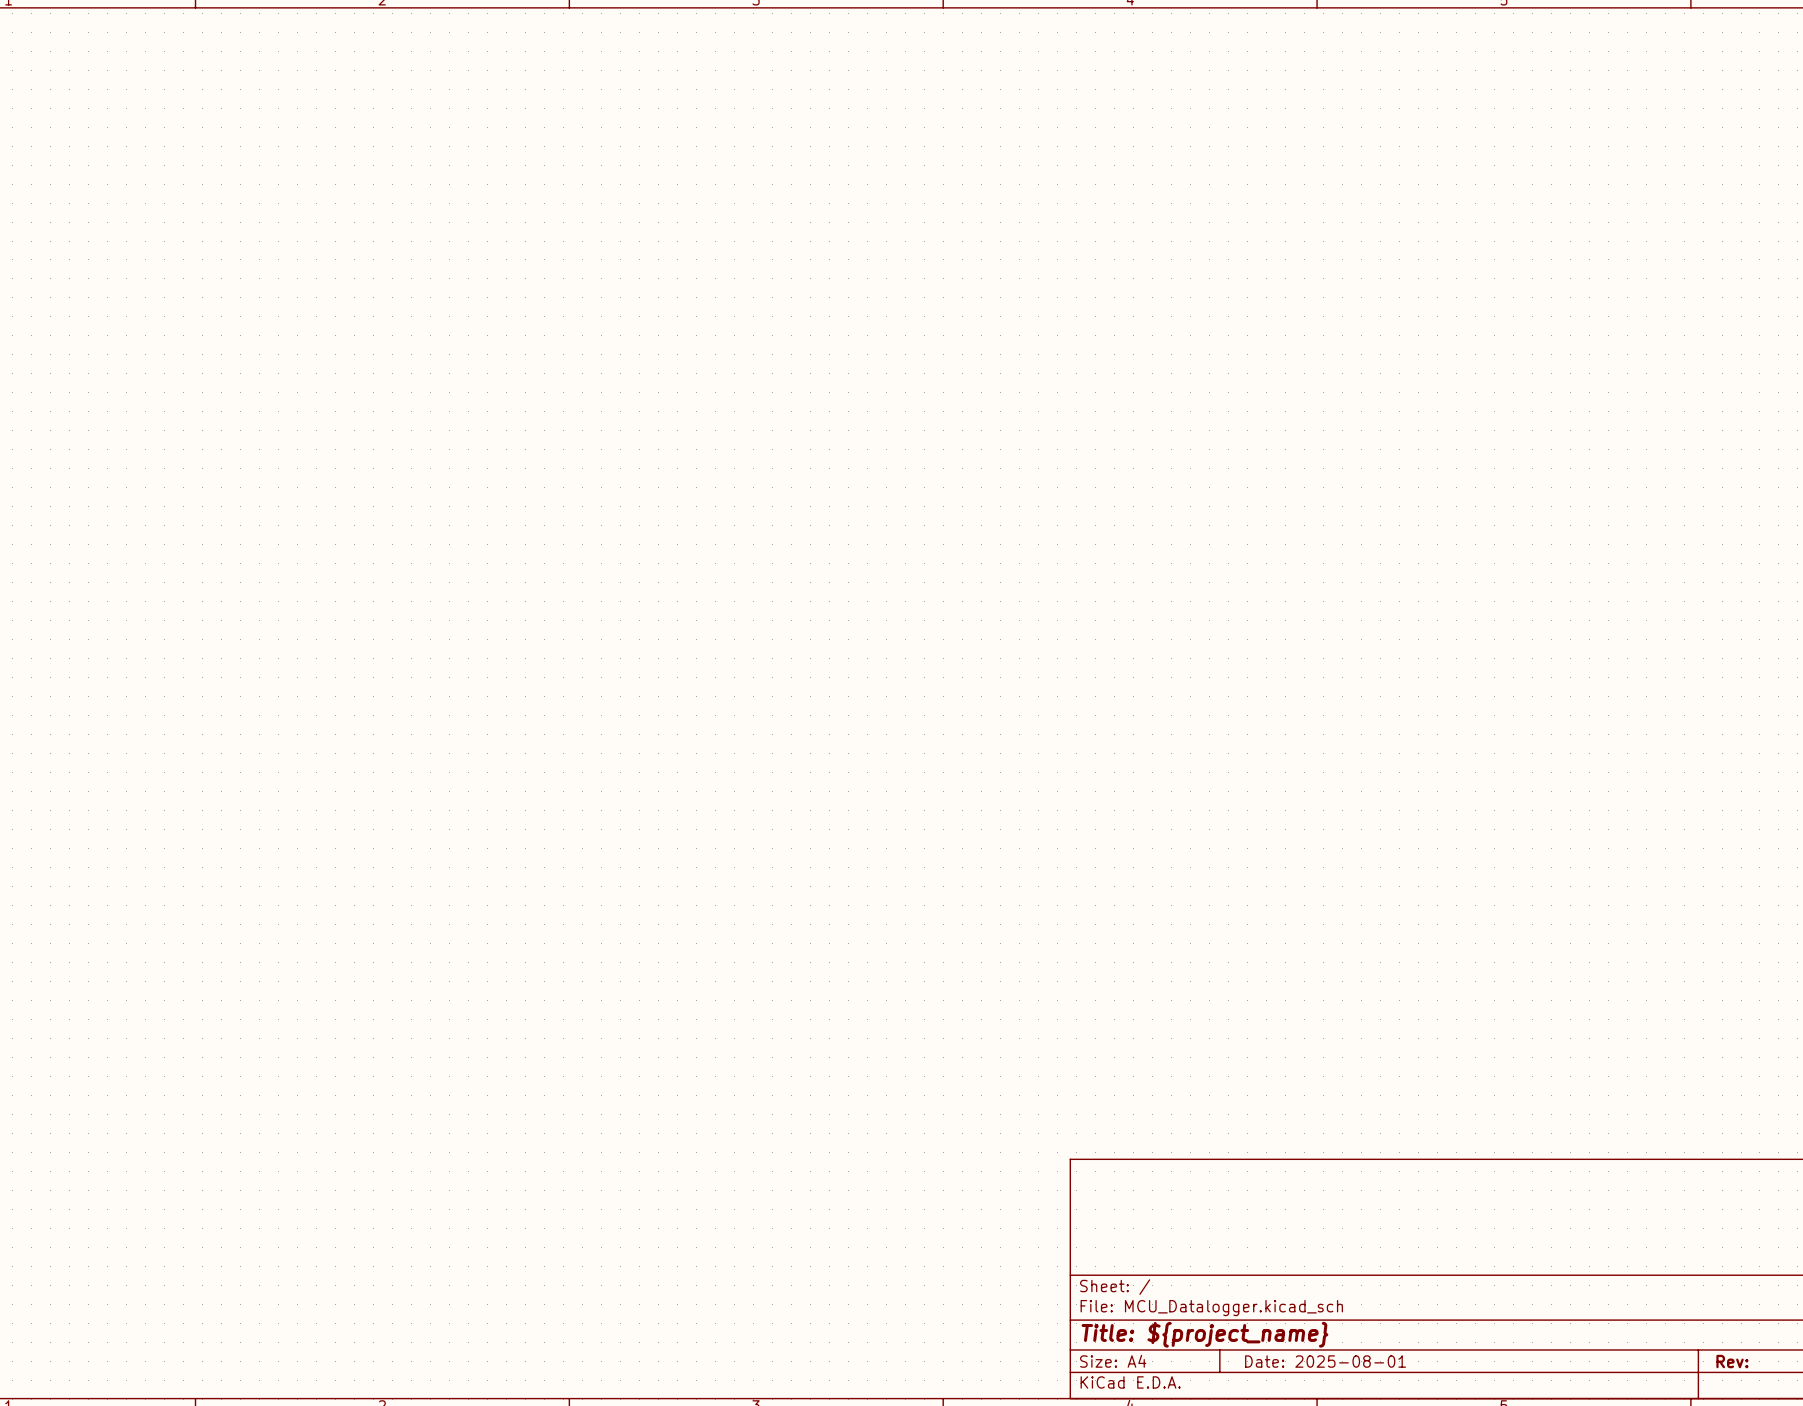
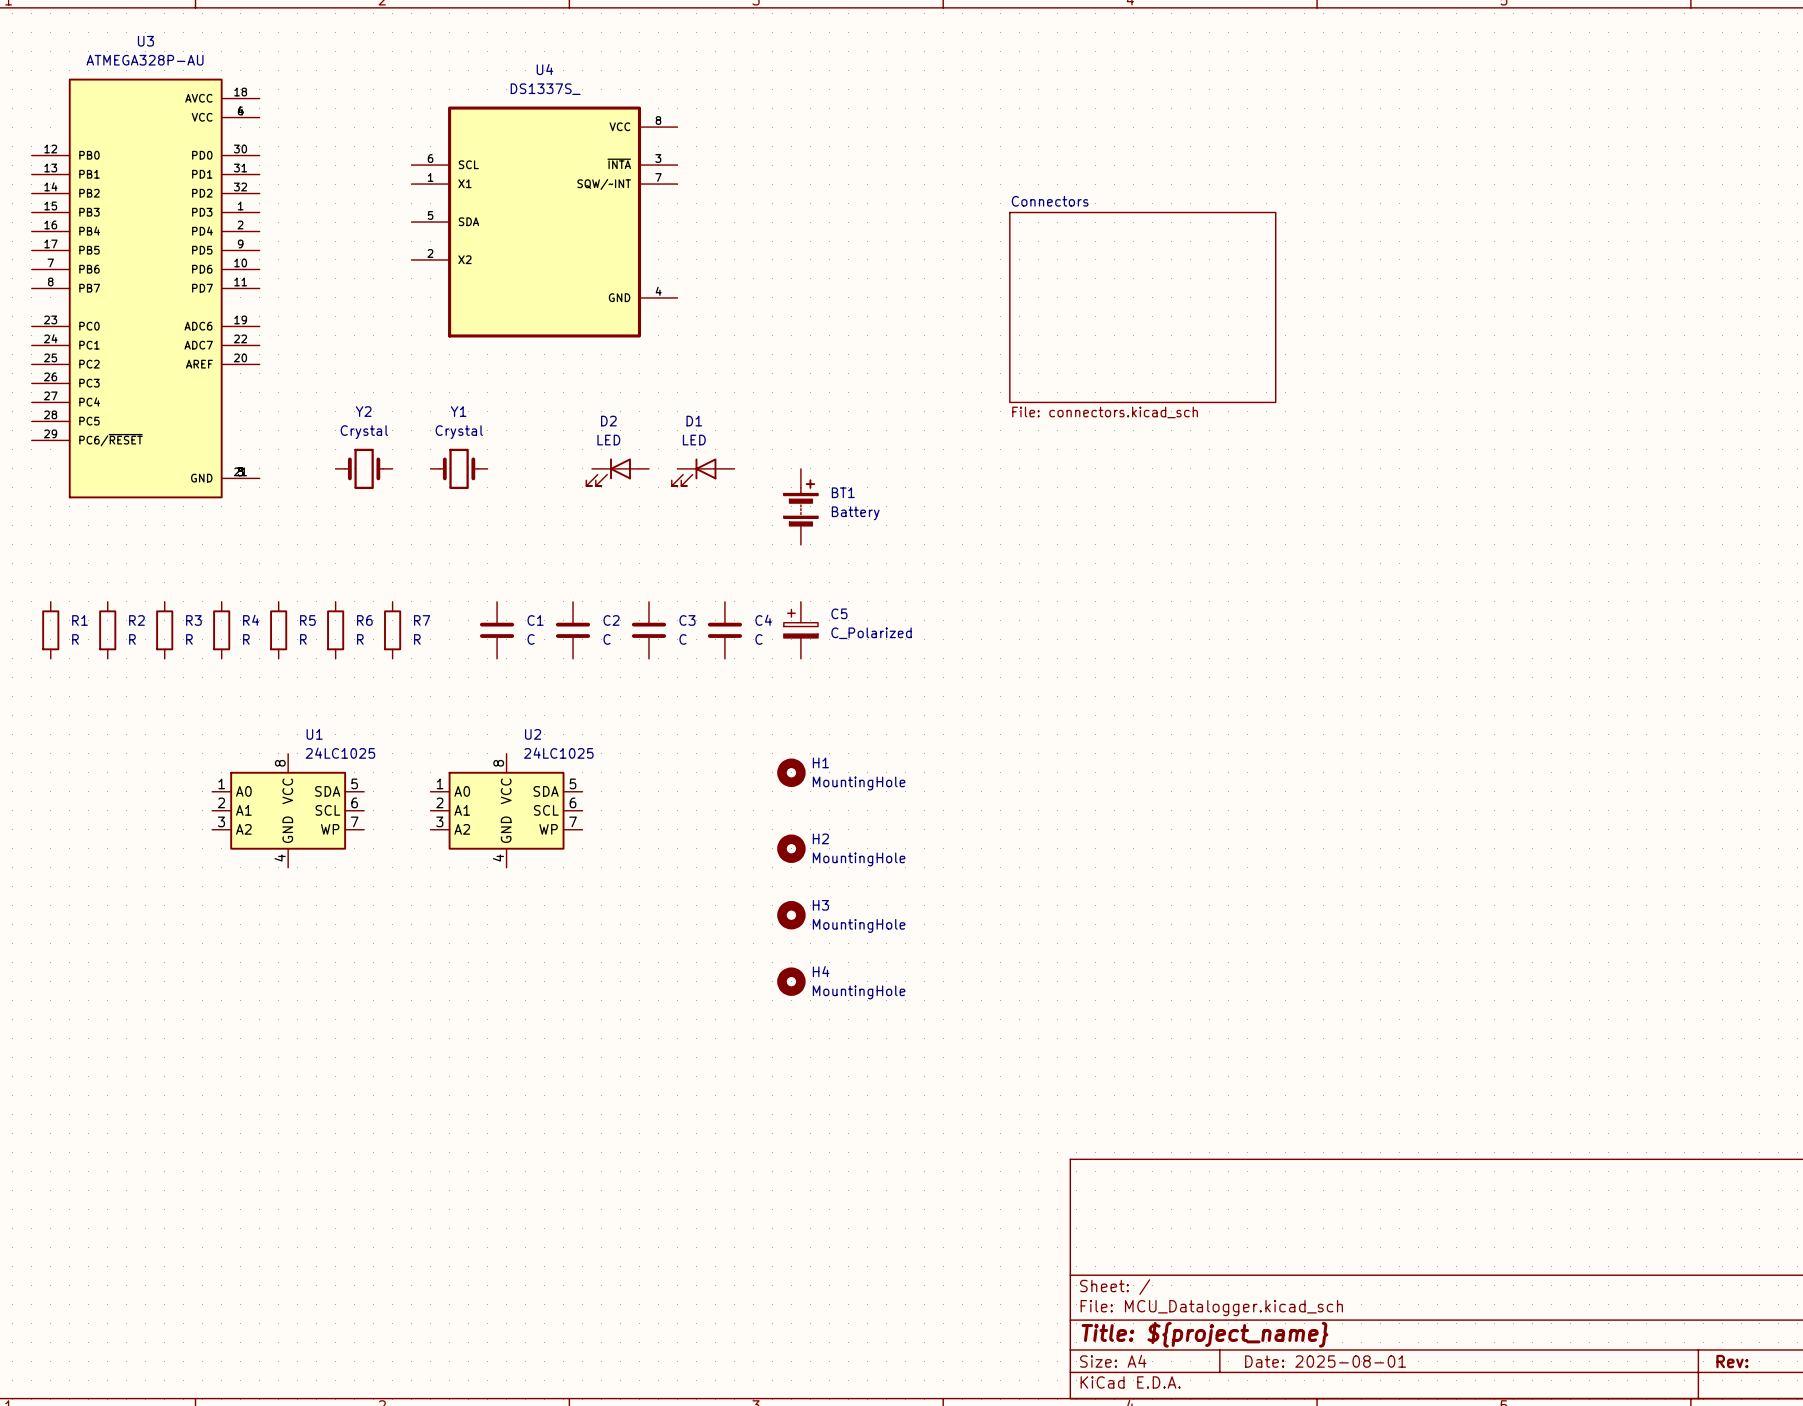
U4: none -> DS1337S_ (544, 222)
U3: none -> ATMEGA328P-AU (145, 288)
sheet Connectors: none -> File: connectors.kicad_sch (1142, 307)
Y2: none -> Crystal (364, 468)
Y1: none -> Crystal (459, 468)
D2: none -> LED (617, 472)
D1: none -> LED (703, 472)
BT1: none -> Battery (800, 506)
R1: none -> R (50, 630)
R2: none -> R (107, 630)
R3: none -> R (164, 630)
R4: none -> R (221, 630)
R5: none -> R (278, 630)
R6: none -> R (335, 630)
R7: none -> R (392, 630)
C1: none -> C (497, 630)
C2: none -> C (573, 630)
C3: none -> C (648, 630)
C4: none -> C (724, 630)
C5: none -> C_Polarized (800, 630)
H1: none -> MountingHole (791, 772)
U1: none -> 24LC1025 (288, 810)
U2: none -> 24LC1025 (506, 810)
H2: none -> MountingHole (791, 848)
H3: none -> MountingHole (791, 915)
H4: none -> MountingHole (791, 981)

